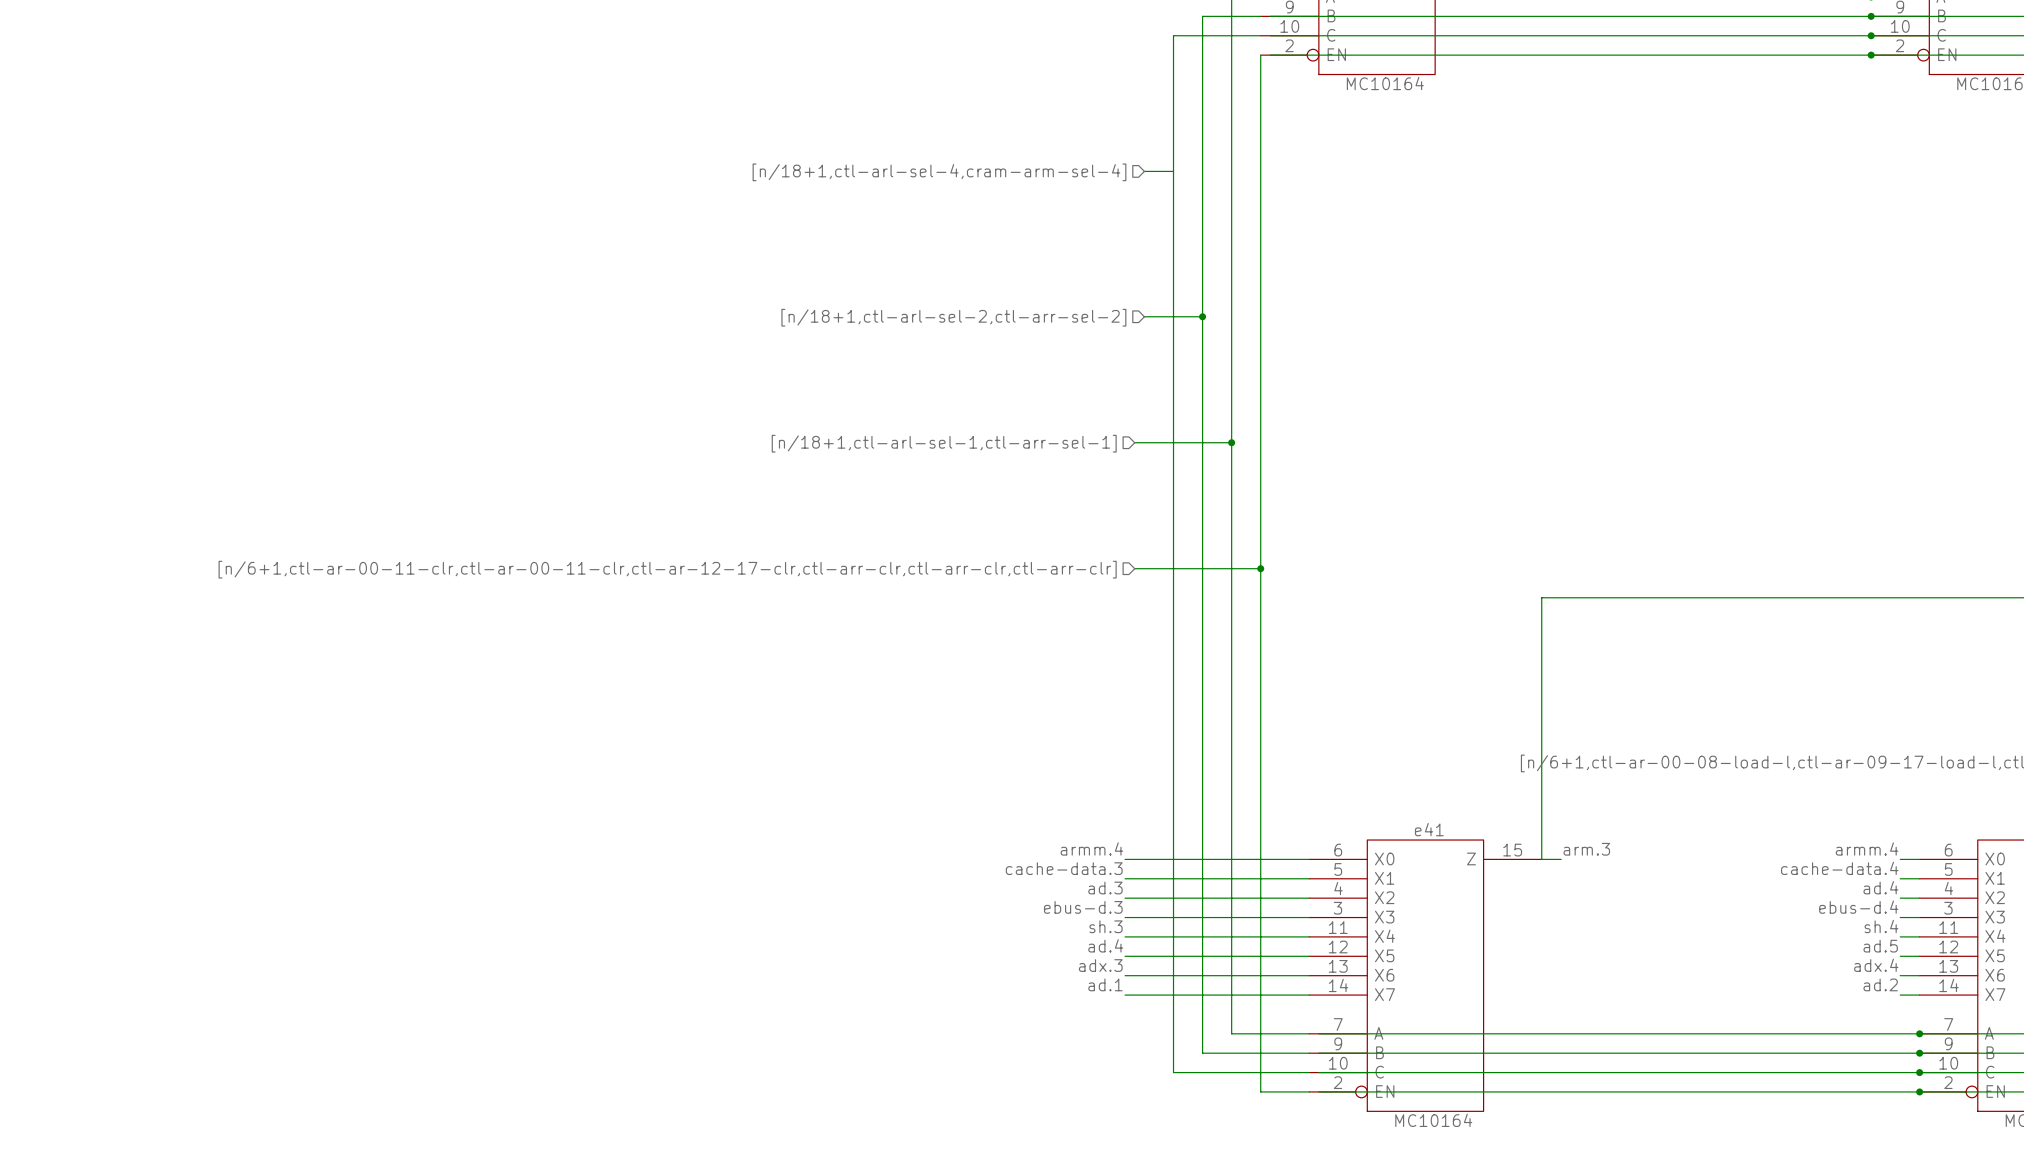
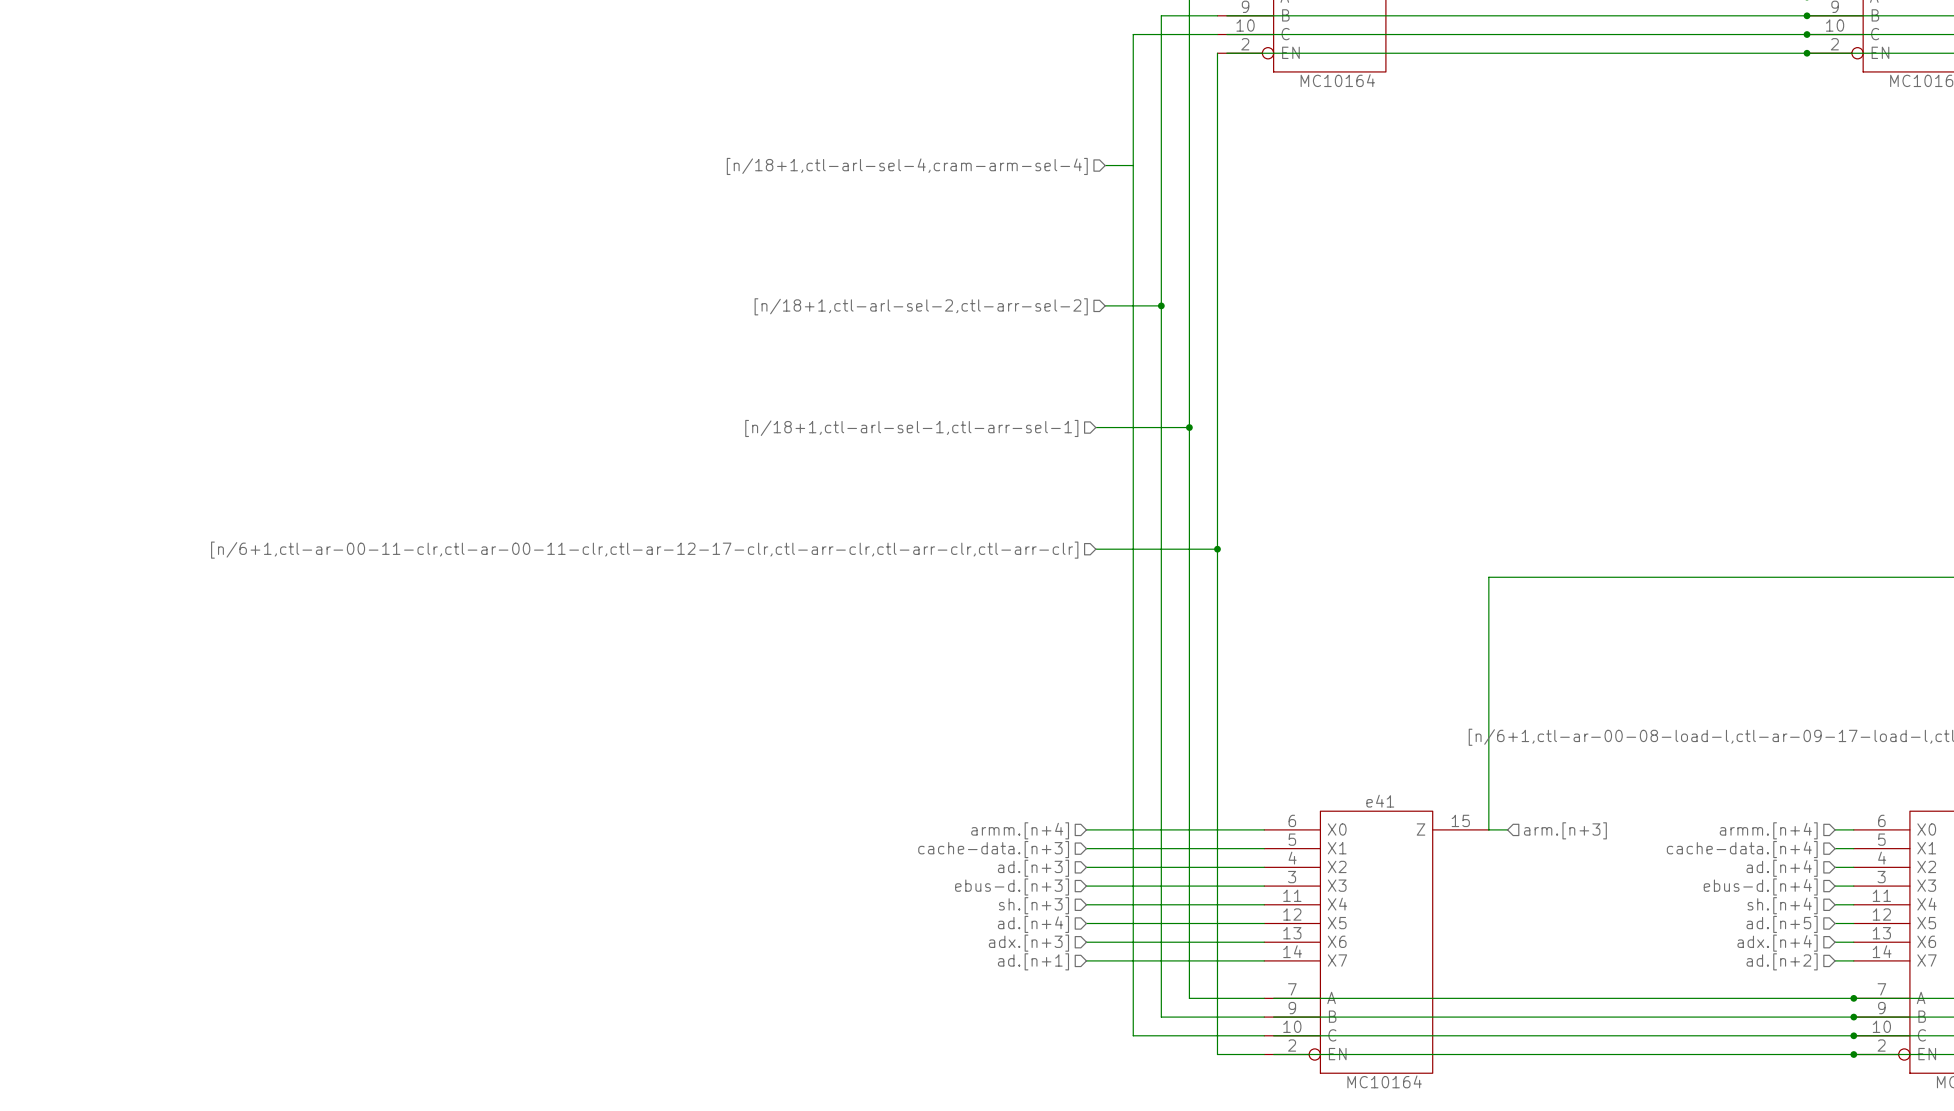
label: armm.4 (1091, 848) -> none
label: armm.4 (1867, 848) -> none
label: arm.3 (1586, 849) -> none
hierarchical label: none -> armm.[n+4] (1020, 830)
hierarchical label: none -> arm.[n+3] (1565, 830)
hierarchical label: none -> armm.[n+4] (1768, 830)
label: cache-data.3 (1064, 868) -> none
label: cache-data.4 (1839, 868) -> none
hierarchical label: none -> cache-data.[n+3] (993, 849)
hierarchical label: none -> cache-data.[n+4] (1742, 849)
label: ad.4 (1880, 887) -> none
label: ad.3 (1105, 888) -> none
hierarchical label: none -> ad.[n+3] (1033, 868)
hierarchical label: none -> ad.[n+4] (1782, 868)
label: ebus-d.3 (1083, 907) -> none
label: ebus-d.4 (1858, 907) -> none
hierarchical label: none -> ebus-d.[n+3] (1012, 886)
hierarchical label: none -> ebus-d.[n+4] (1760, 886)
label: sh.3 (1106, 926) -> none
label: sh.4 (1881, 926) -> none
hierarchical label: none -> sh.[n+3] (1034, 905)
hierarchical label: none -> sh.[n+4] (1782, 905)
label: ad.4 (1105, 945) -> none
label: ad.5 (1880, 946) -> none
hierarchical label: none -> ad.[n+4] (1033, 924)
hierarchical label: none -> ad.[n+5] (1782, 924)
label: adx.3 (1100, 965) -> none
label: adx.4 (1876, 965) -> none
hierarchical label: none -> adx.[n+3] (1028, 943)
hierarchical label: none -> adx.[n+4] (1777, 943)
label: ad.1 (1105, 984) -> none
label: ad.2 (1880, 984) -> none
hierarchical label: none -> ad.[n+1] (1033, 961)
hierarchical label: none -> ad.[n+2] (1782, 961)

